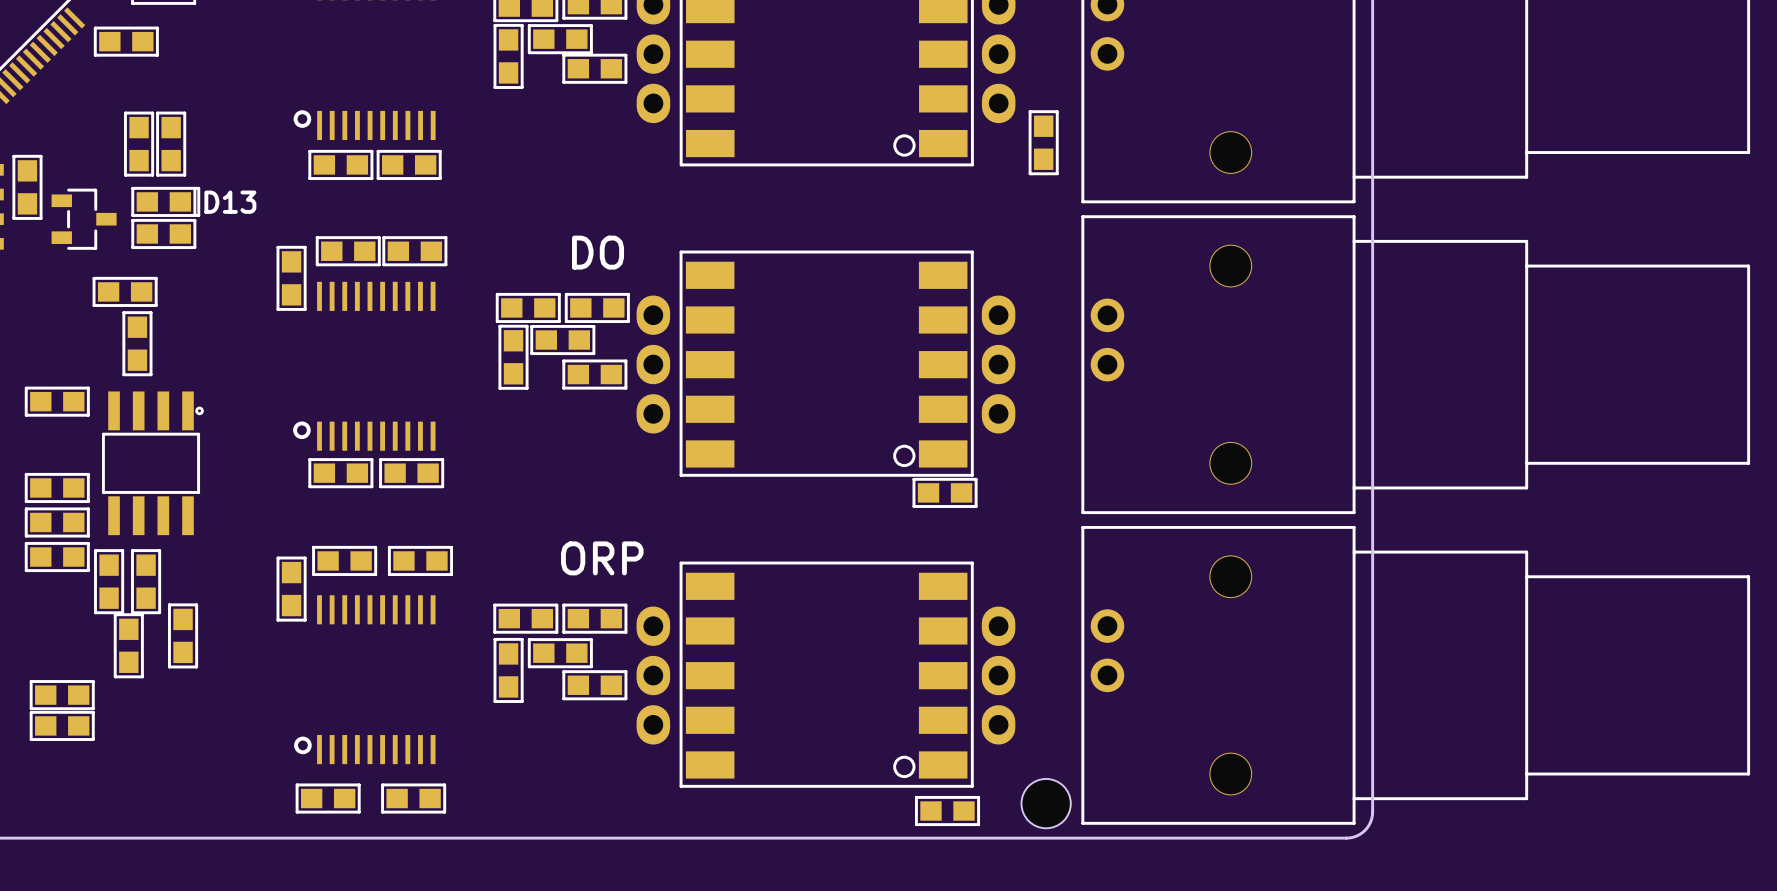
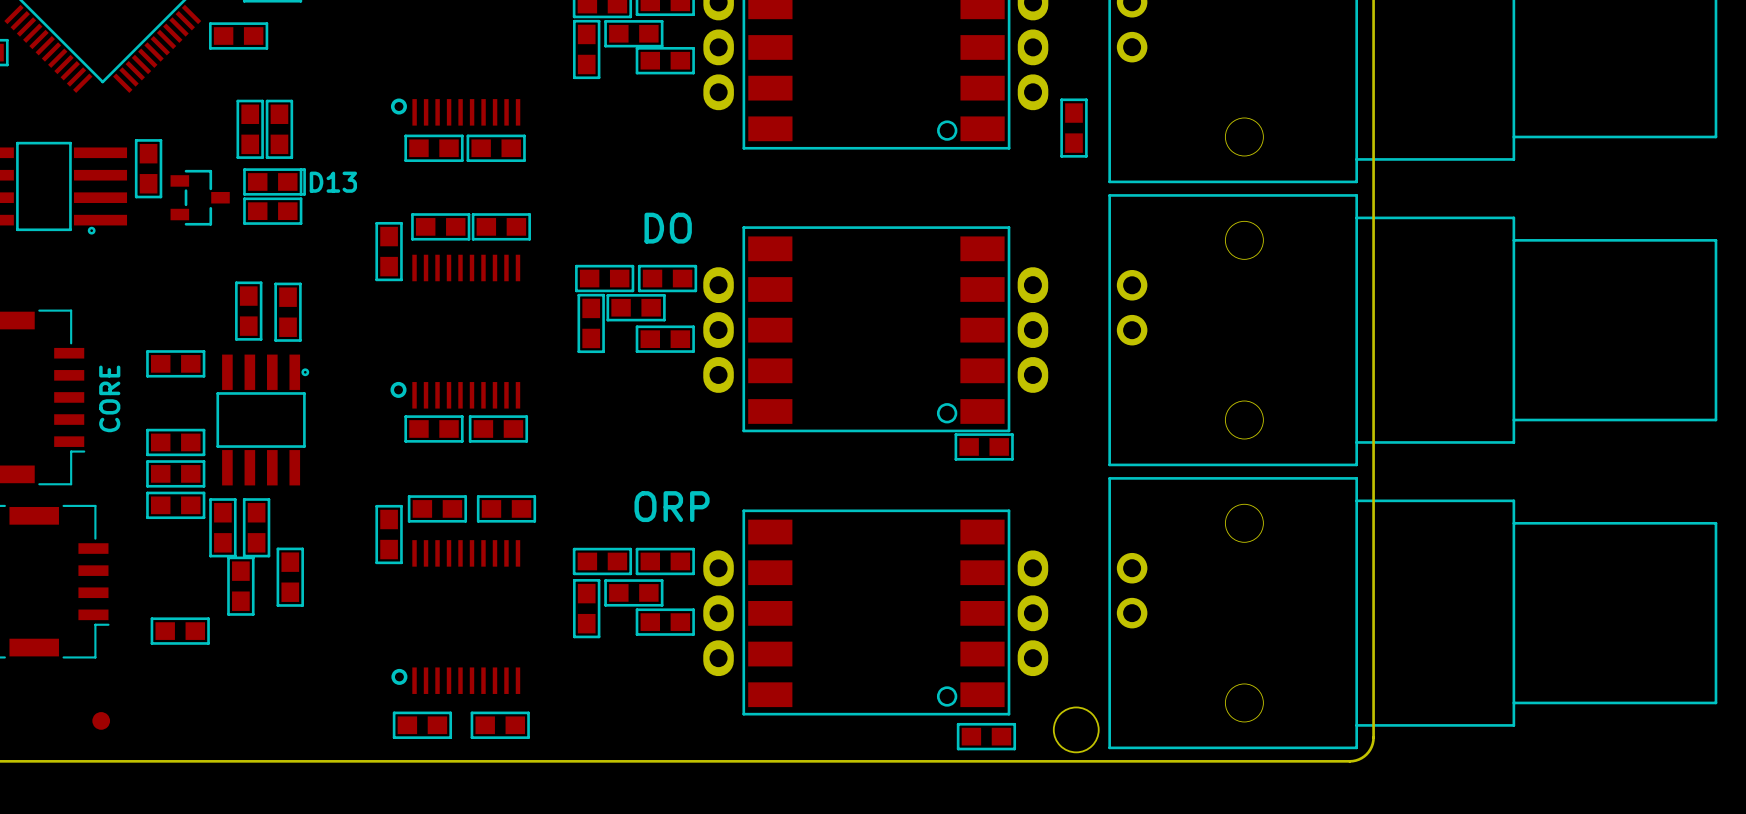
part rotation: 0° (125, 291) -> 90° clockwise (288, 312)
part position: (125, 291) -> (288, 312)
part: (62, 725) -> none

